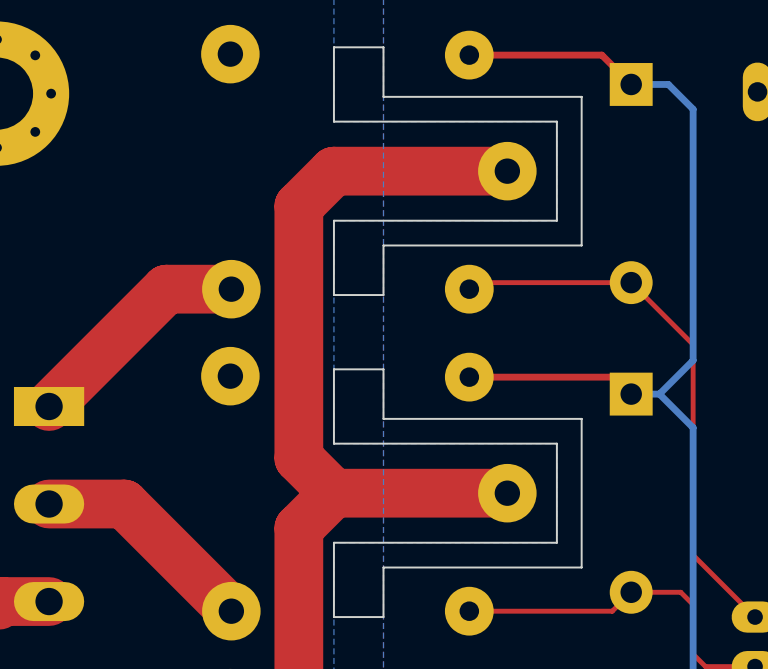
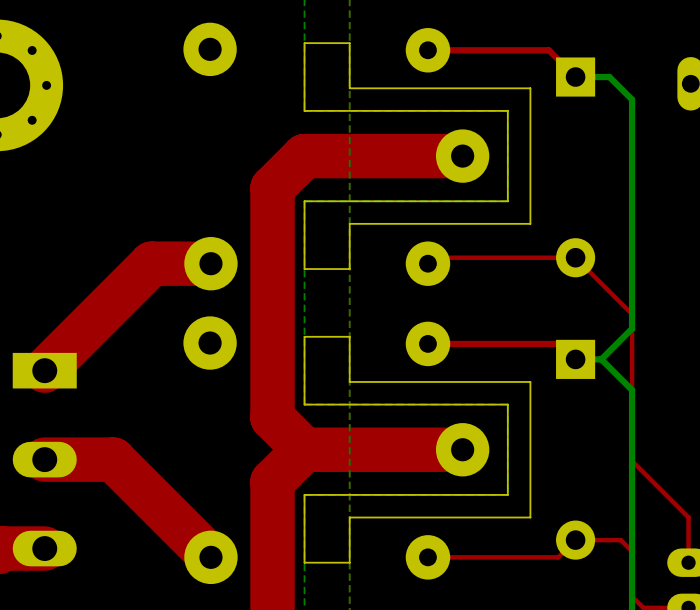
top track: (693, 505) (693, 555) (755, 617) -> (632, 461) (688, 517) (688, 562)

